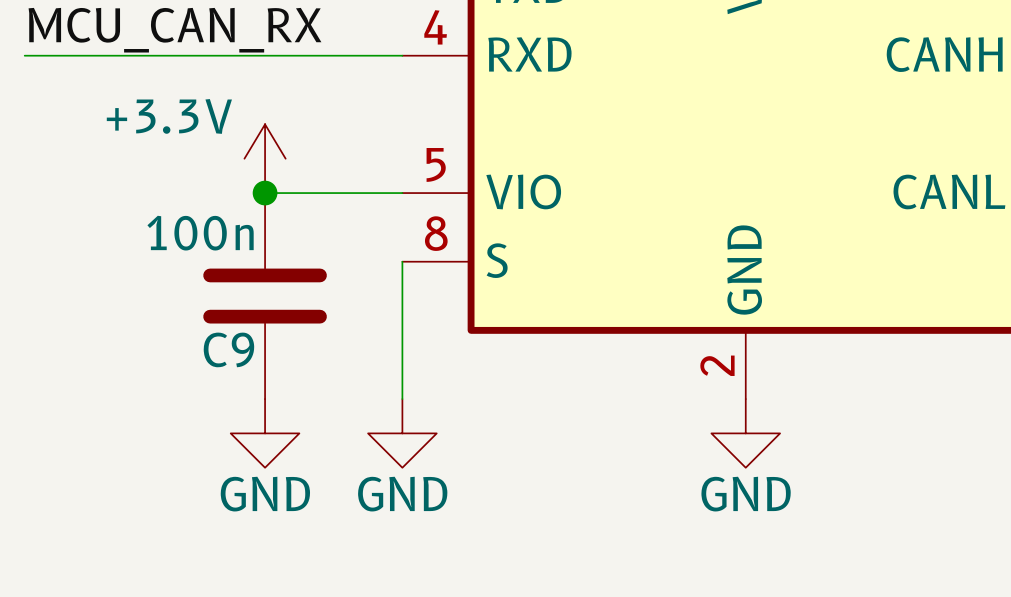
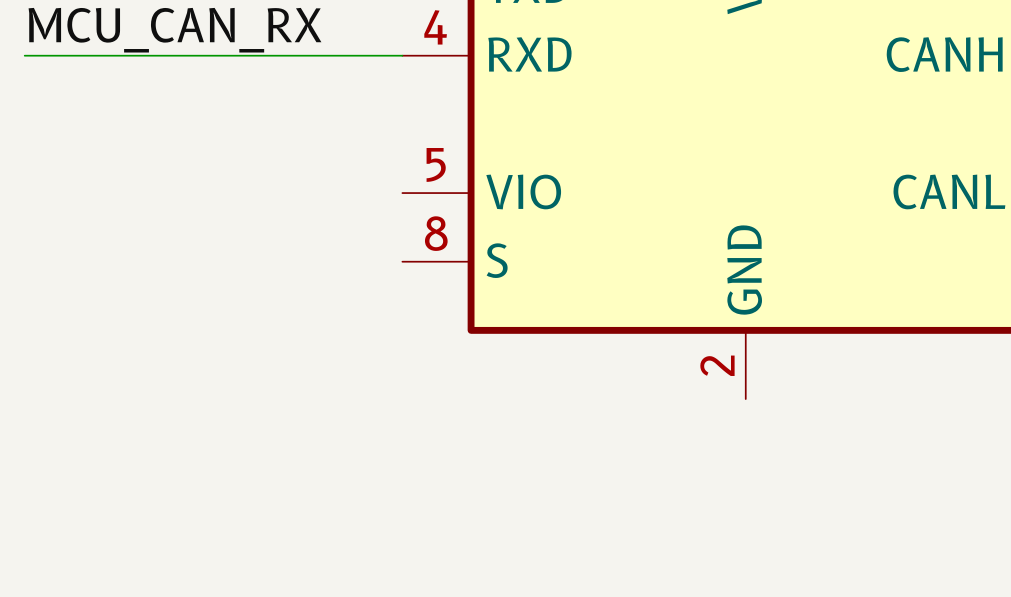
power symbol: +3.3V (265, 158) -> none
wire: (265, 193) (402, 193) -> none
junction: (265, 193) -> none
wire: (402, 261) (402, 399) -> none
C9: 100n (265, 296) -> none
power symbol: GND (265, 433) -> none
power symbol: GND (402, 433) -> none
power symbol: GND (745, 433) -> none

